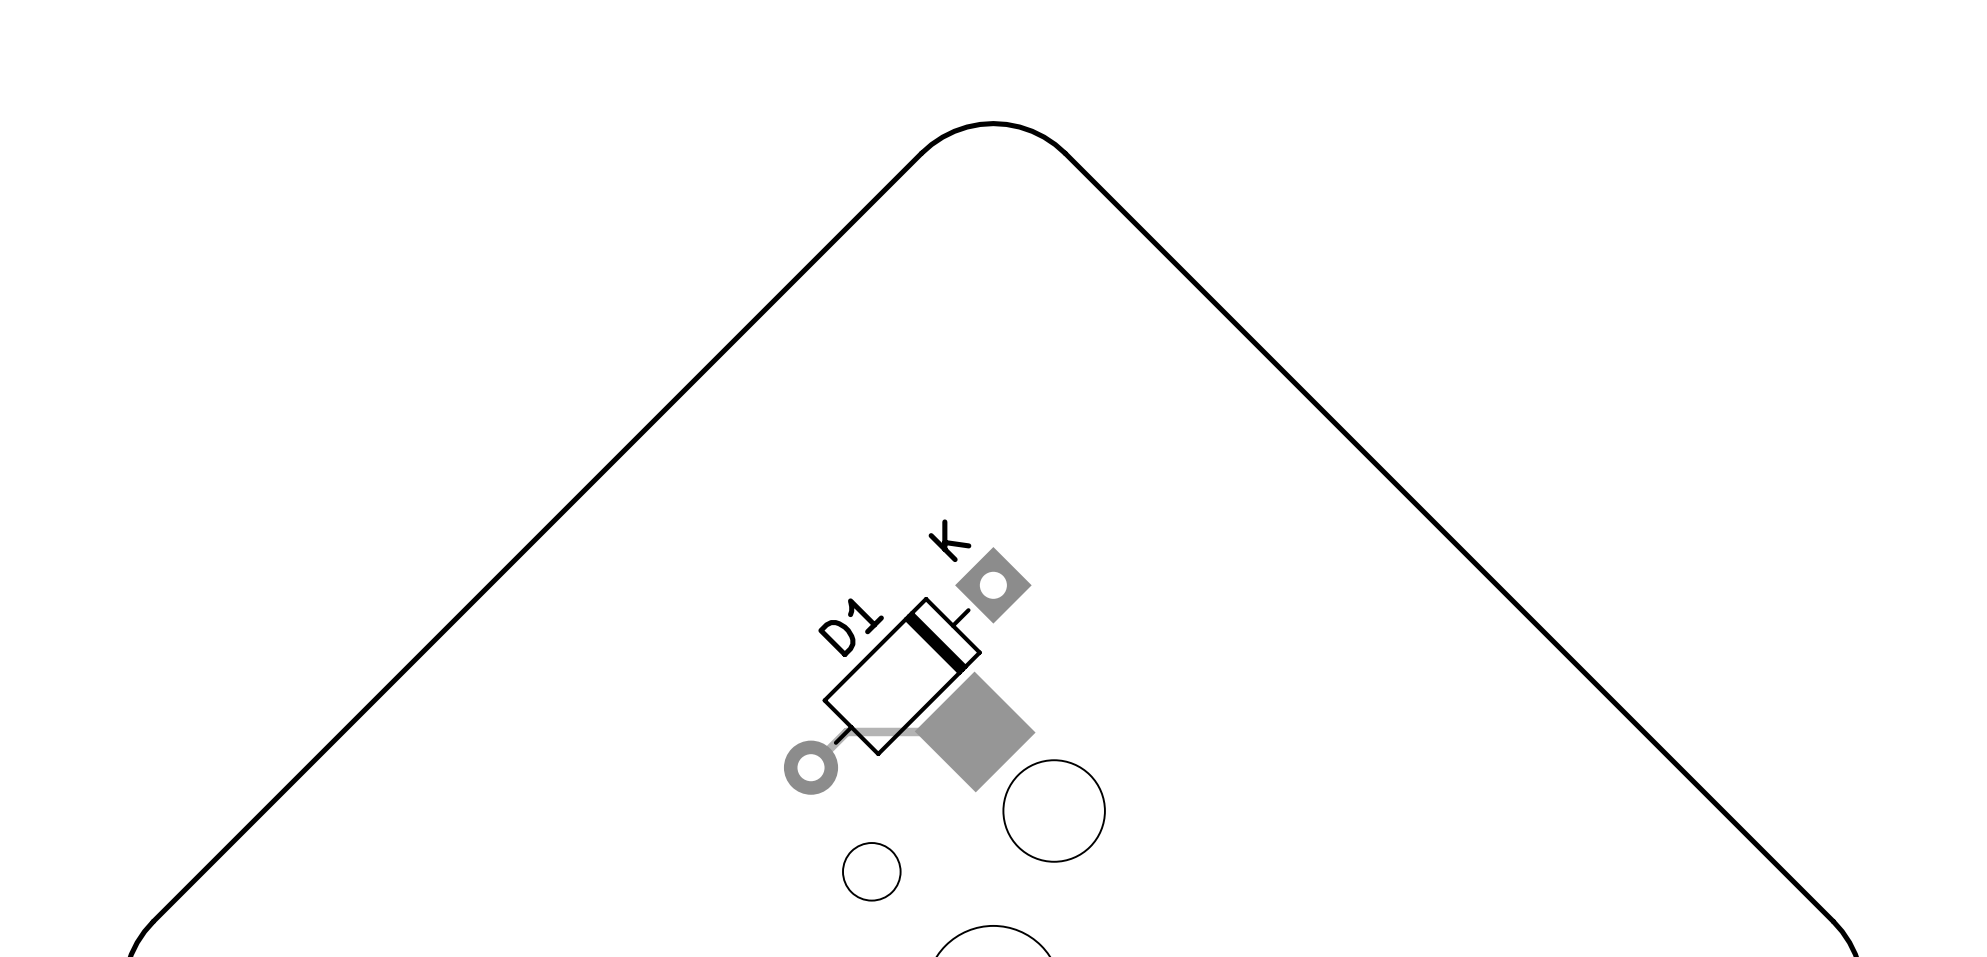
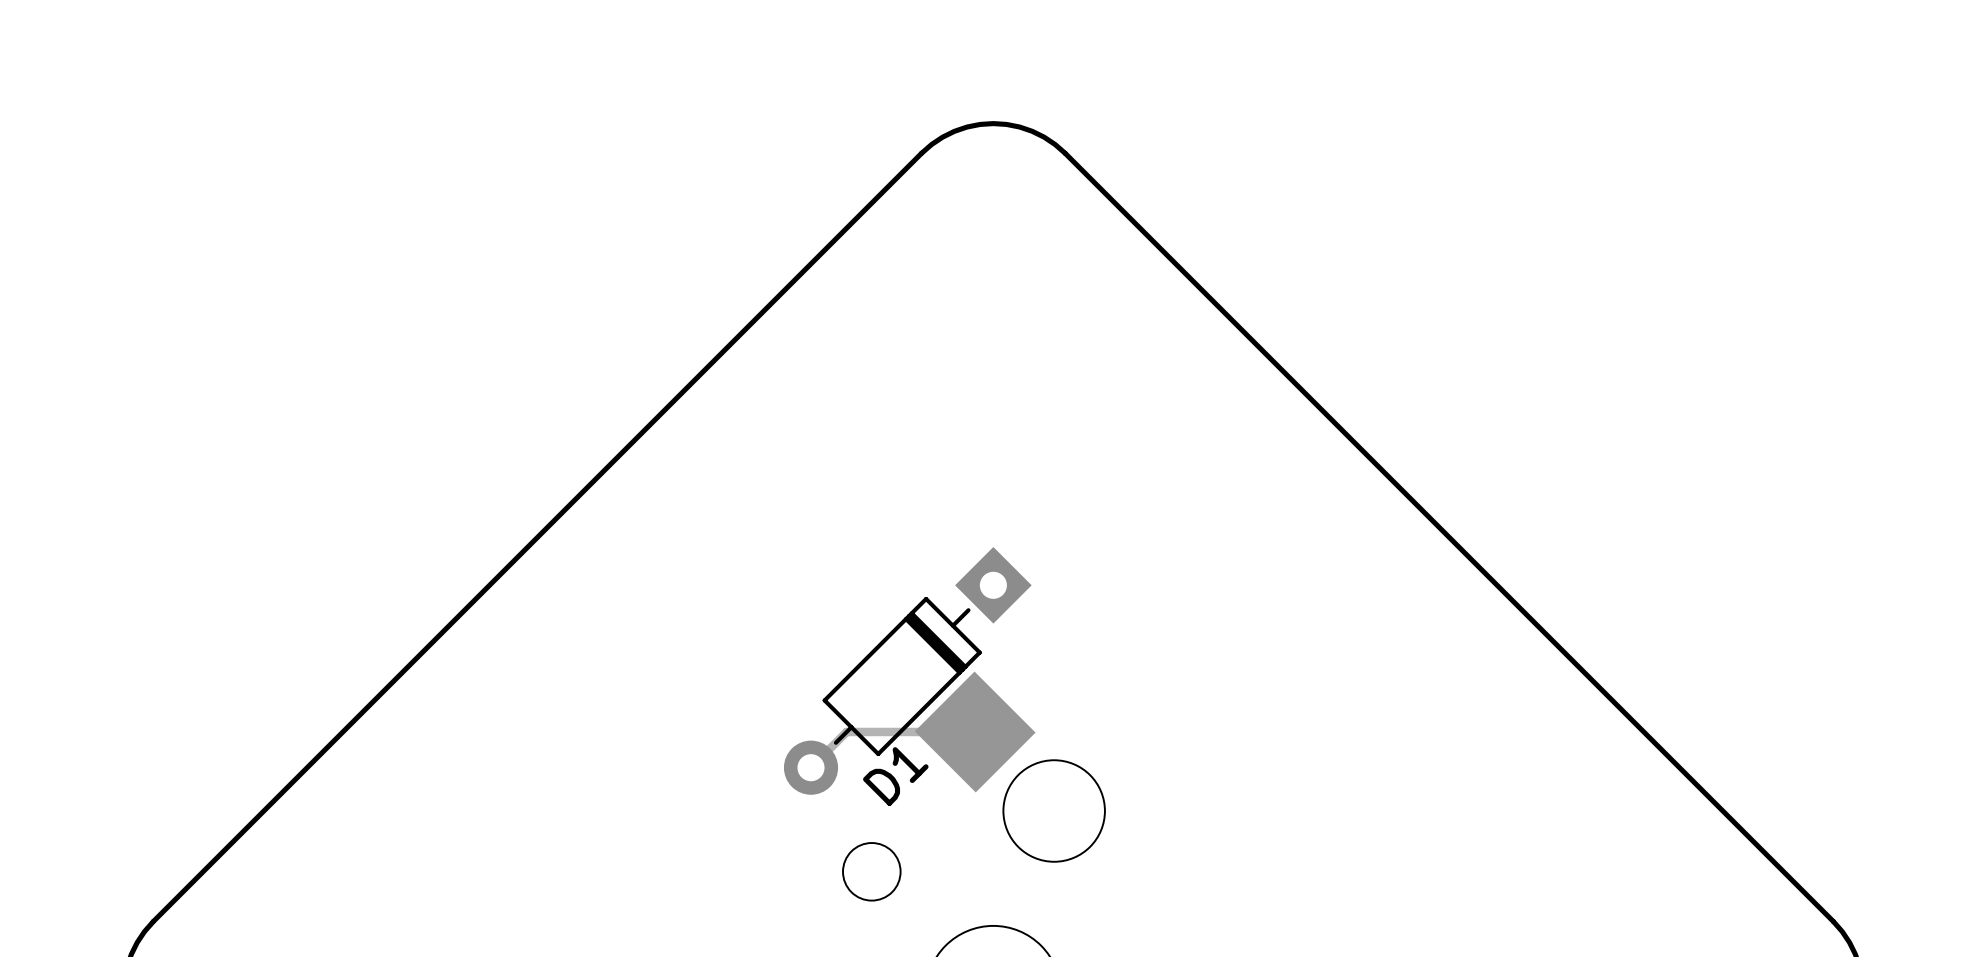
D1 text: K (949, 540) -> none
D1 name position: D1 (851, 627) -> D1 (895, 776)

